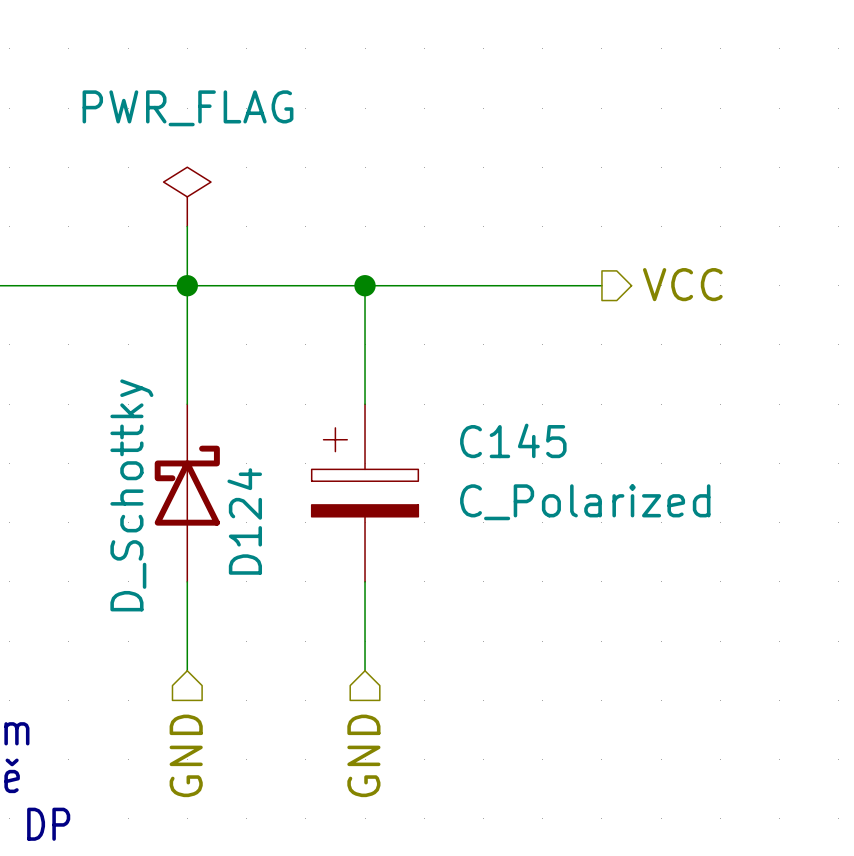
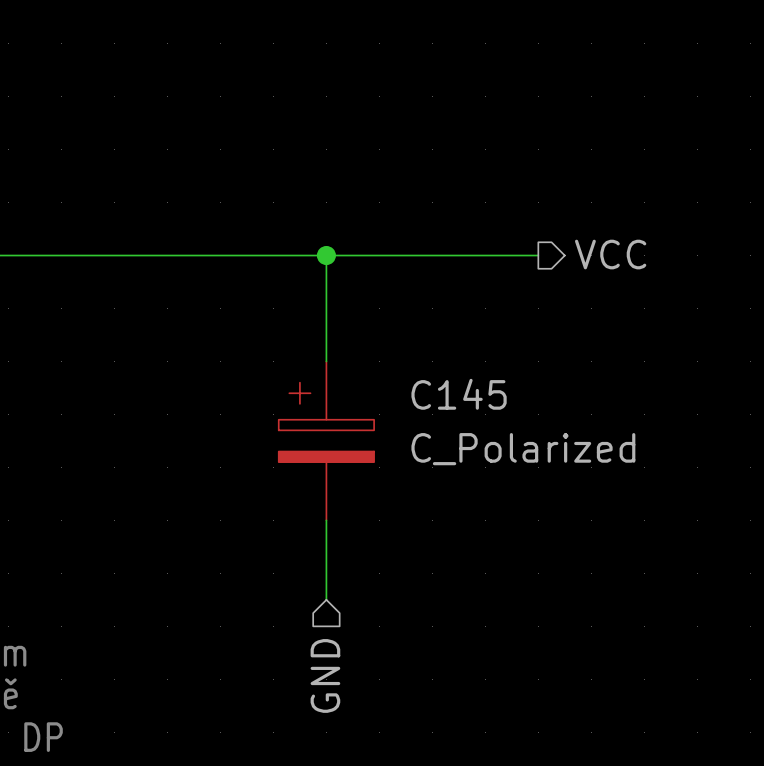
power symbol: PWR_FLAG (187, 196) -> none
wire: (187, 226) (187, 404) -> none
junction: (187, 285) -> none
D124: D_Schottky (187, 493) -> none
wire: (187, 581) (187, 670) -> none
hierarchical label: GND (186, 755) -> none

